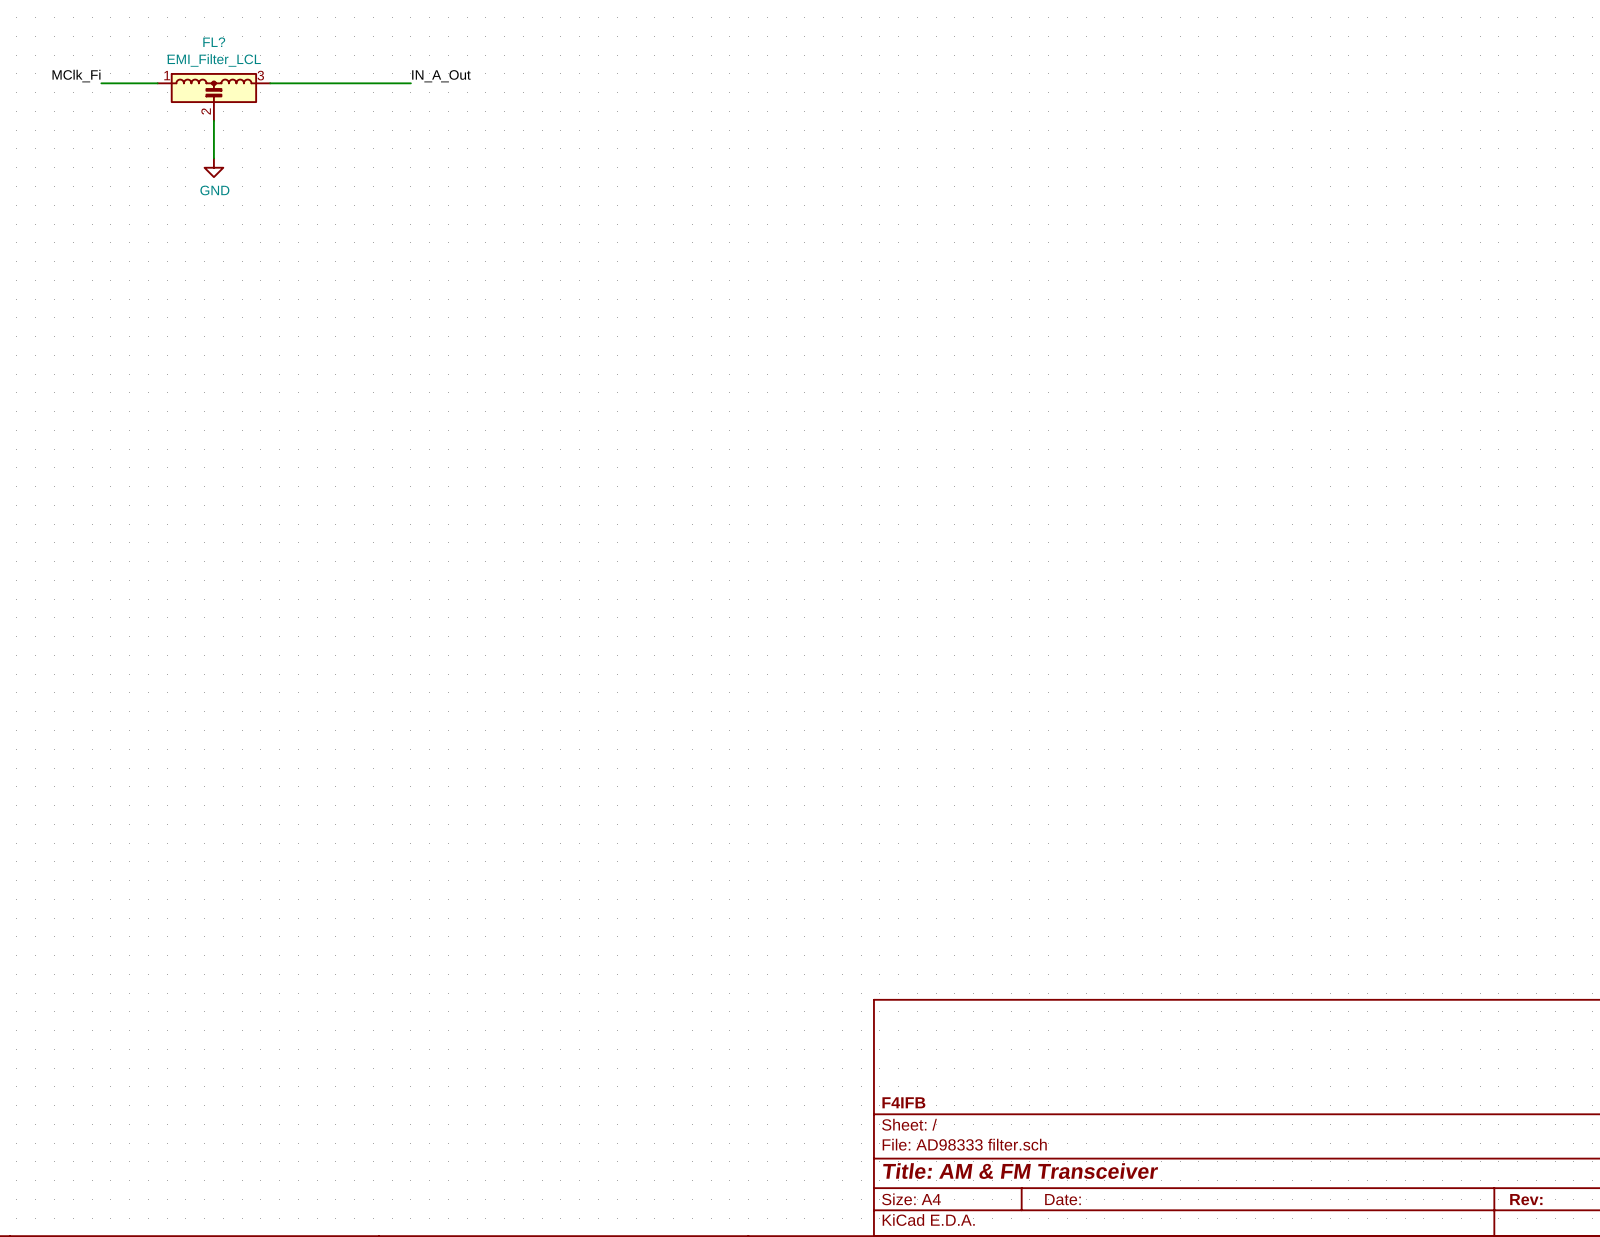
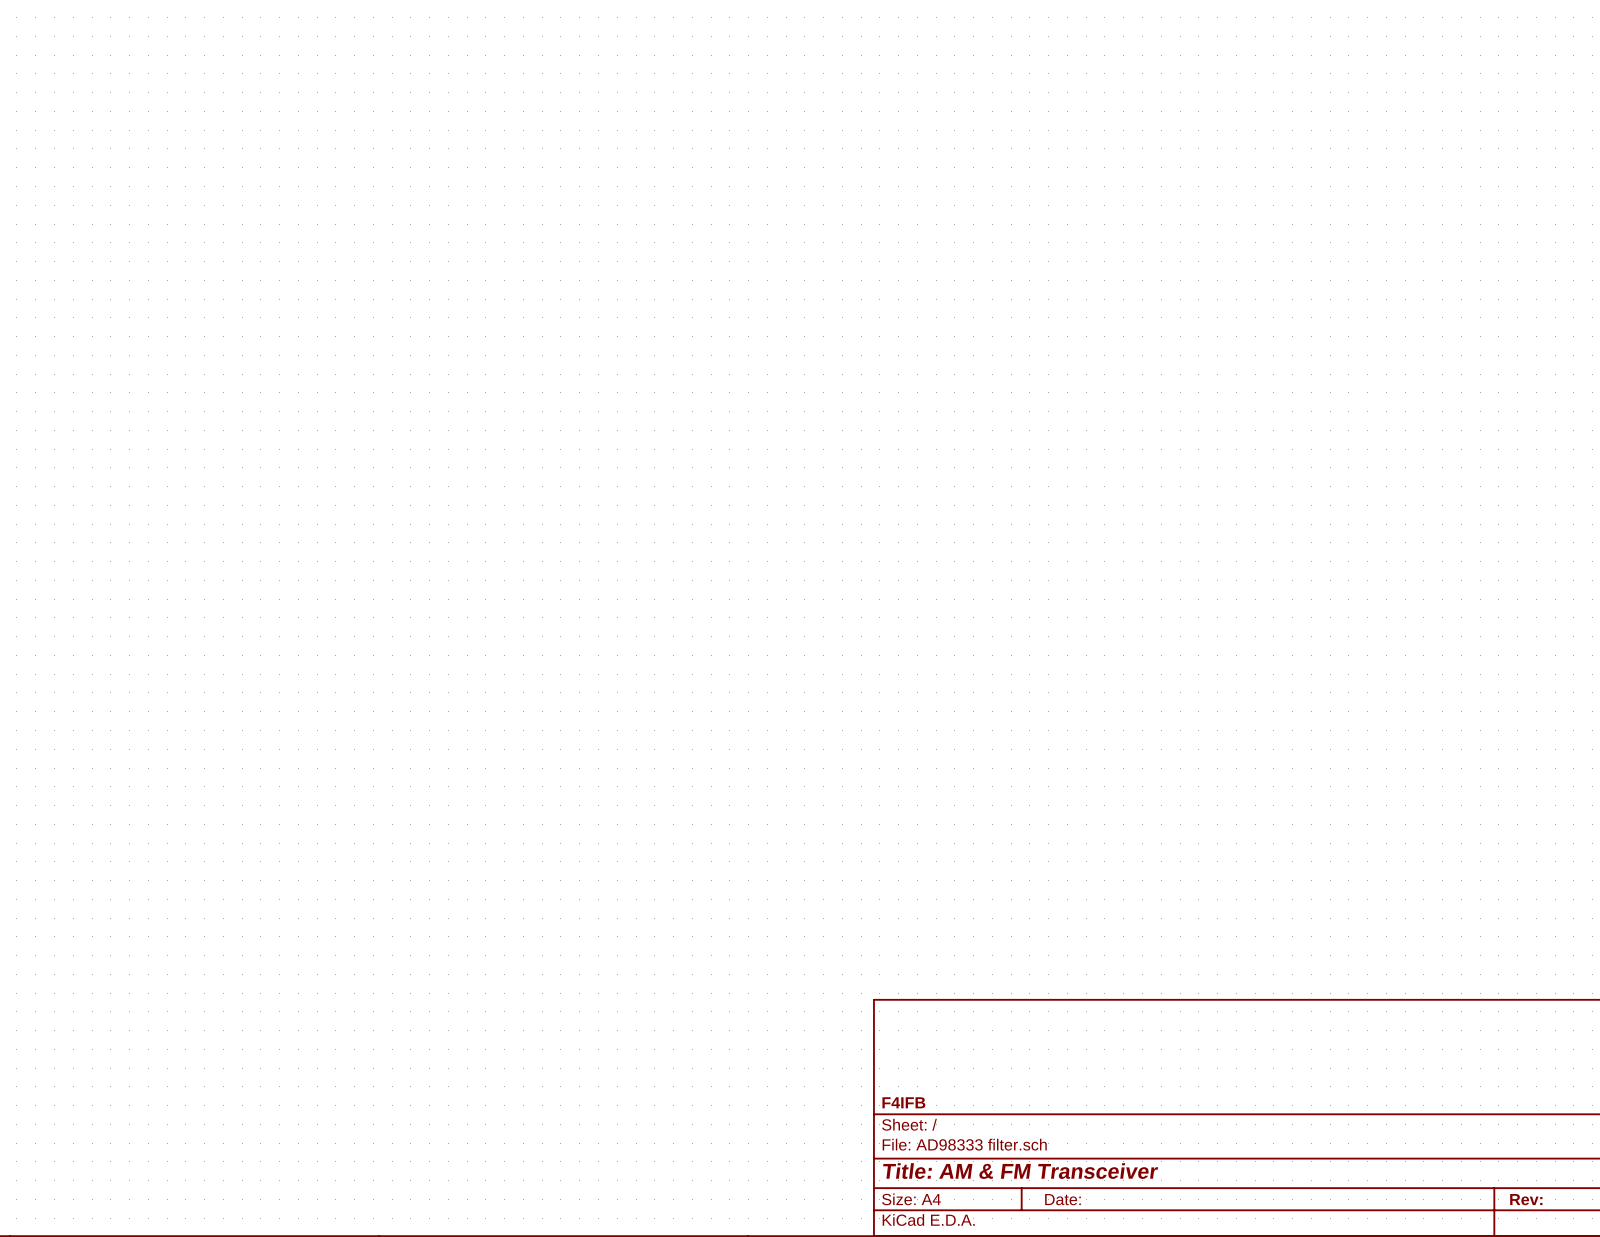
label: MClk_Fi (76, 76) -> none
label: IN_A_Out (441, 76) -> none
wire: (101, 83) (157, 83) -> none
wire: (270, 83) (410, 83) -> none
FL?: EMI_Filter_LCL (213, 96) -> none
wire: (213, 120) (213, 158) -> none
power symbol: GND (213, 167) -> none

